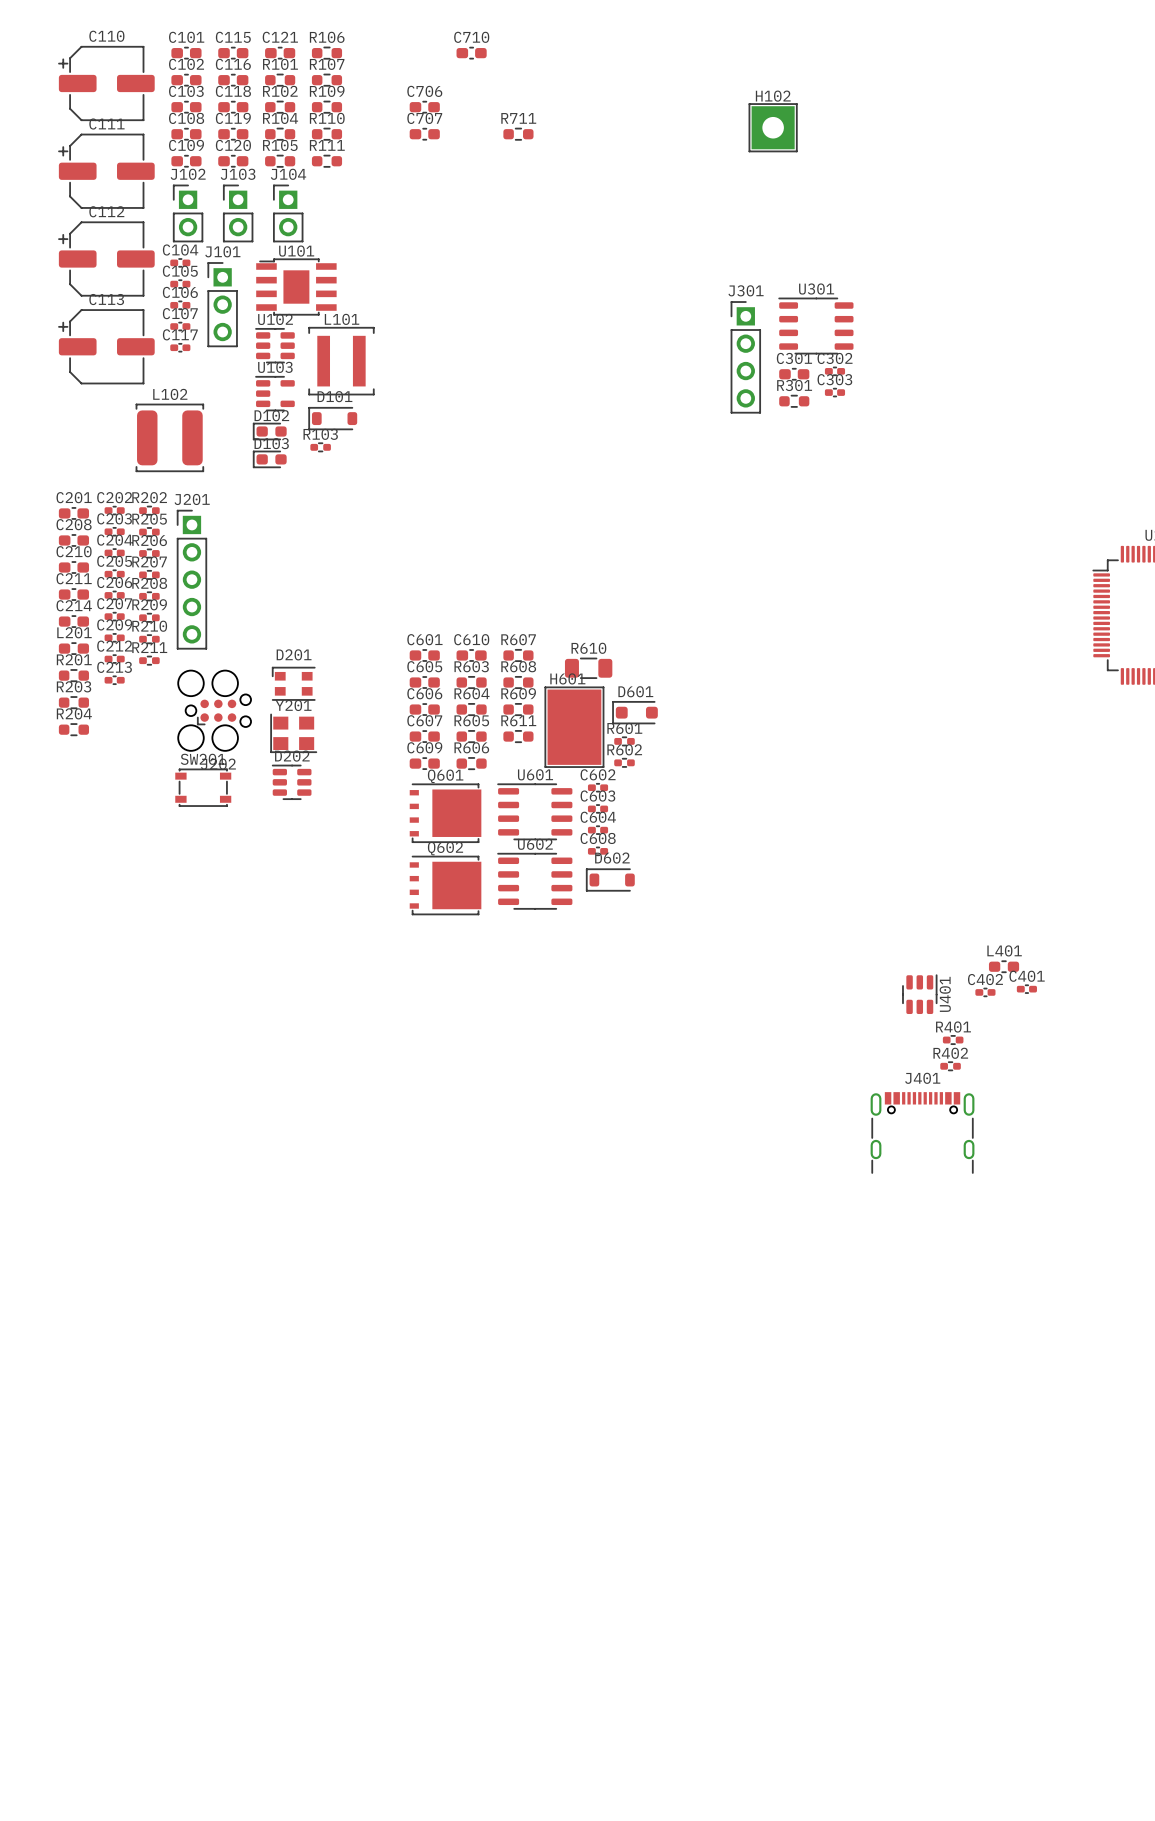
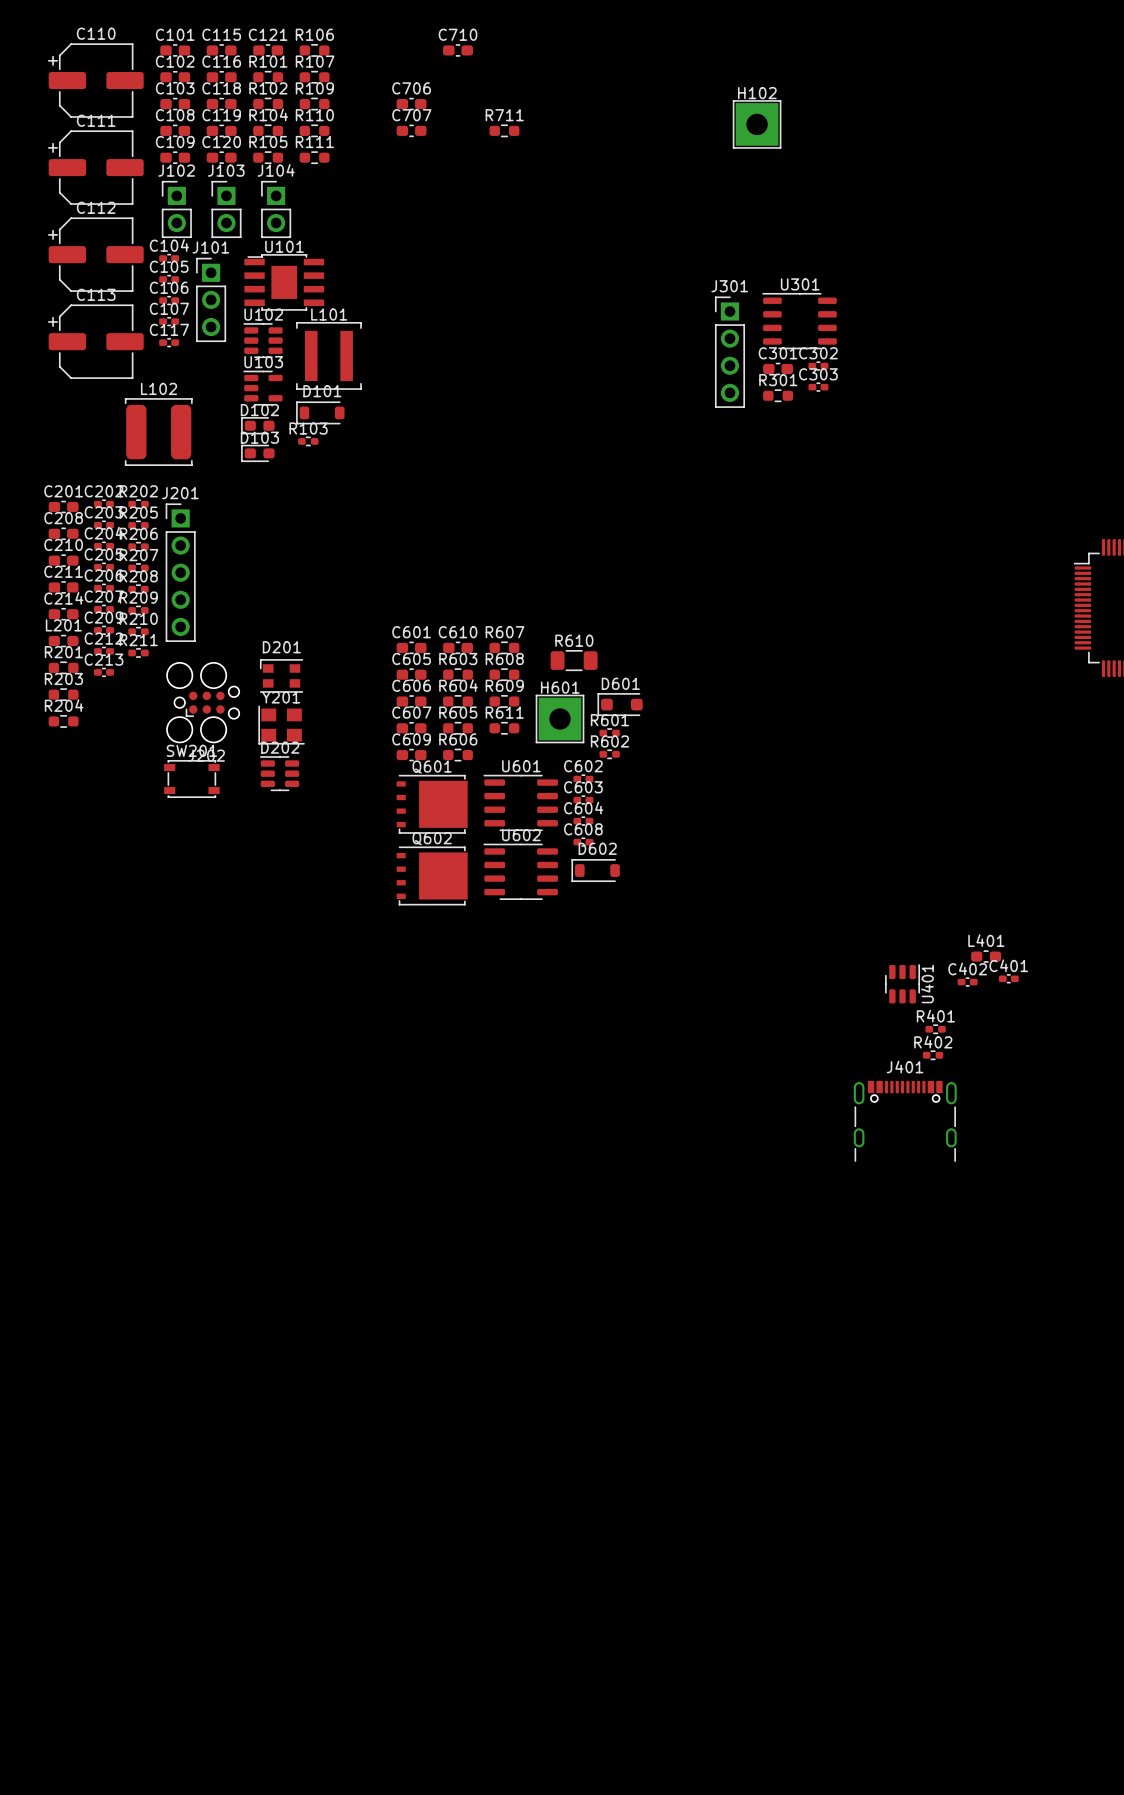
H601 footprint: [544, 686, 605, 768] -> [535, 694, 585, 744]

